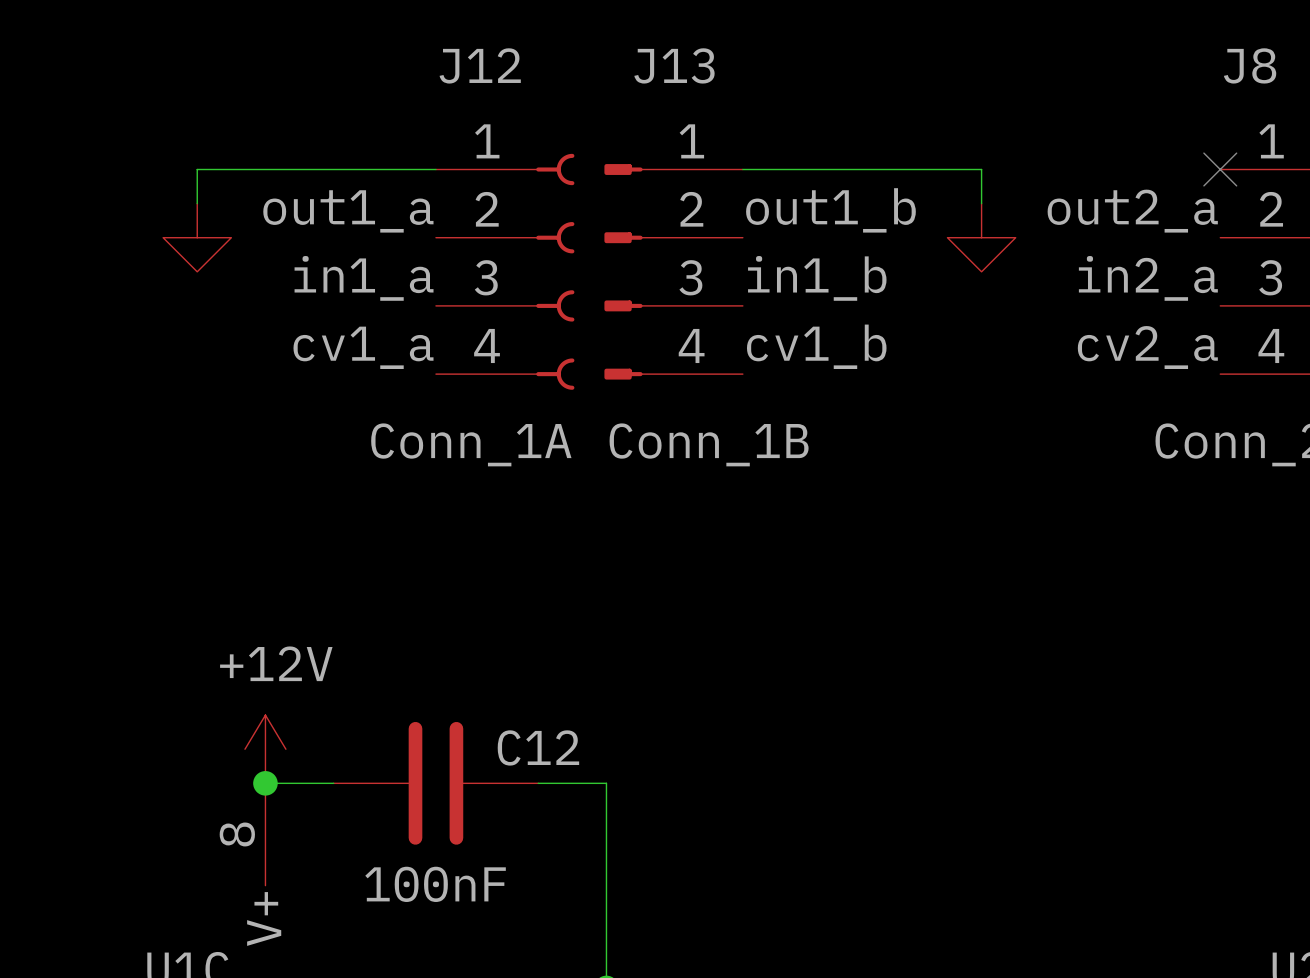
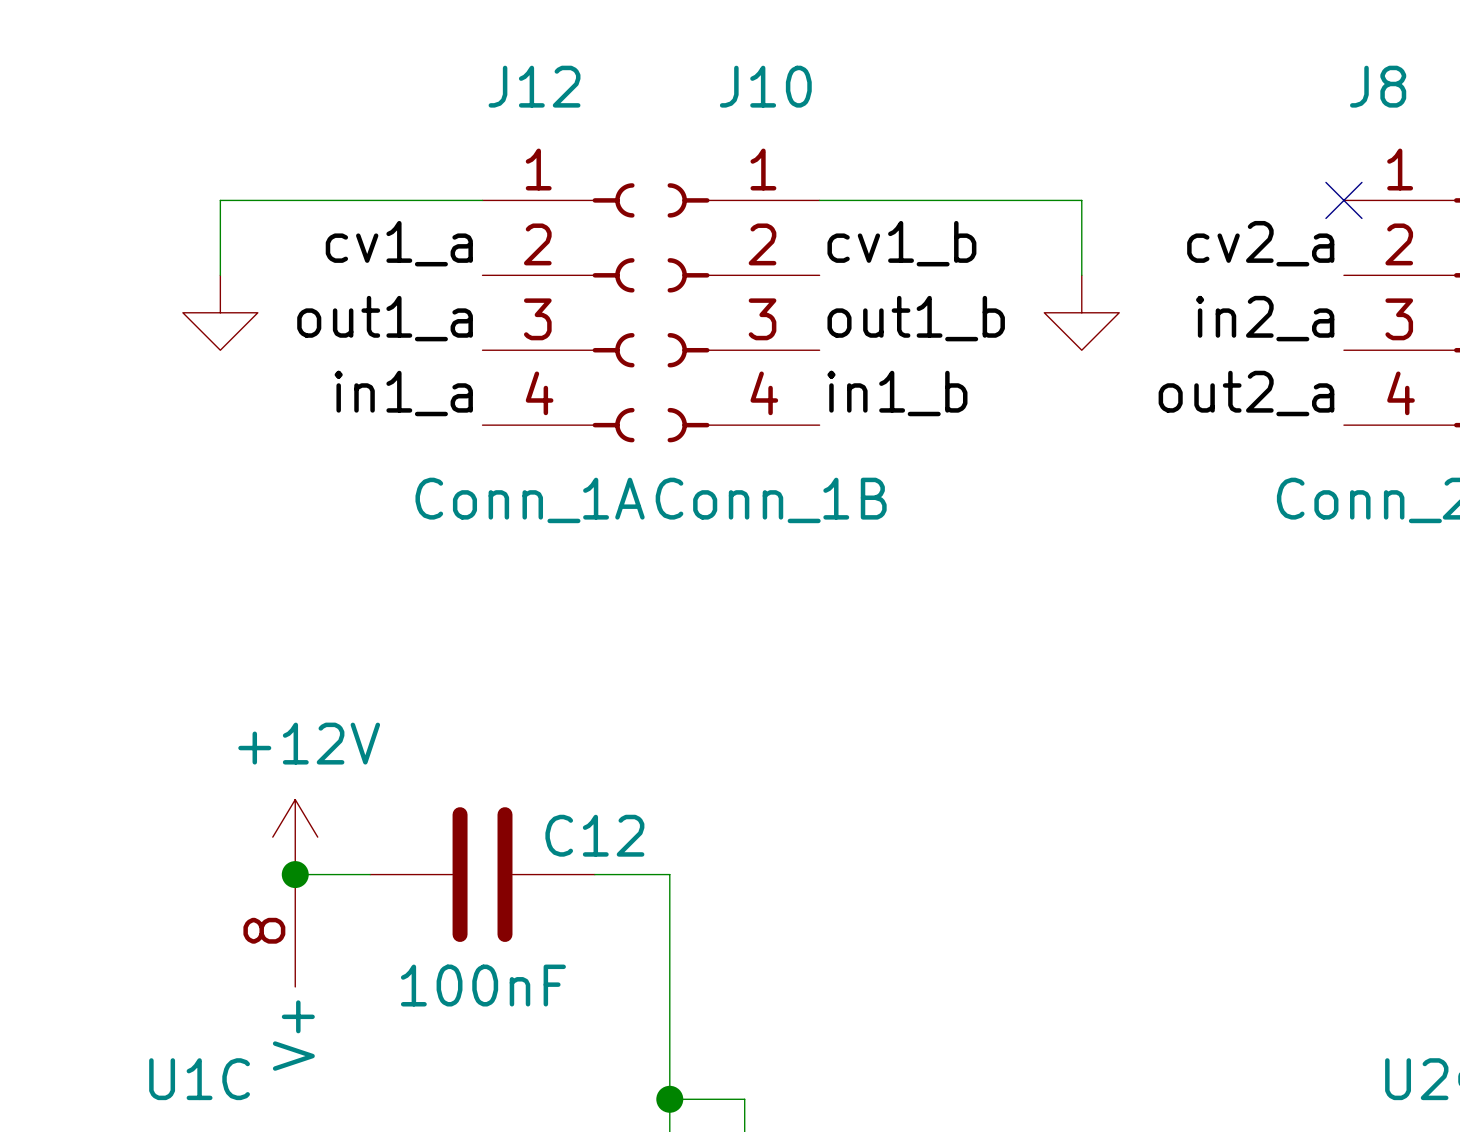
label: out1_b (830, 210) -> cv1_b (901, 243)
label: out1_a (348, 211) -> cv1_a (399, 243)
label: out2_a (1132, 211) -> cv2_a (1260, 243)
power symbol position: (197, 237) -> (220, 312)
power symbol position: (981, 237) -> (1081, 312)
J13: Conn_1B (673, 271) -> none
J10: none -> Conn_1B (743, 312)
label: in1_a (364, 278) -> out1_a (385, 318)
label: in1_b (817, 278) -> out1_b (916, 318)
label: cv1_b (816, 346) -> in1_b (897, 393)
label: cv1_a (363, 347) -> in1_a (403, 393)
label: cv2_a (1147, 347) -> out2_a (1246, 393)

